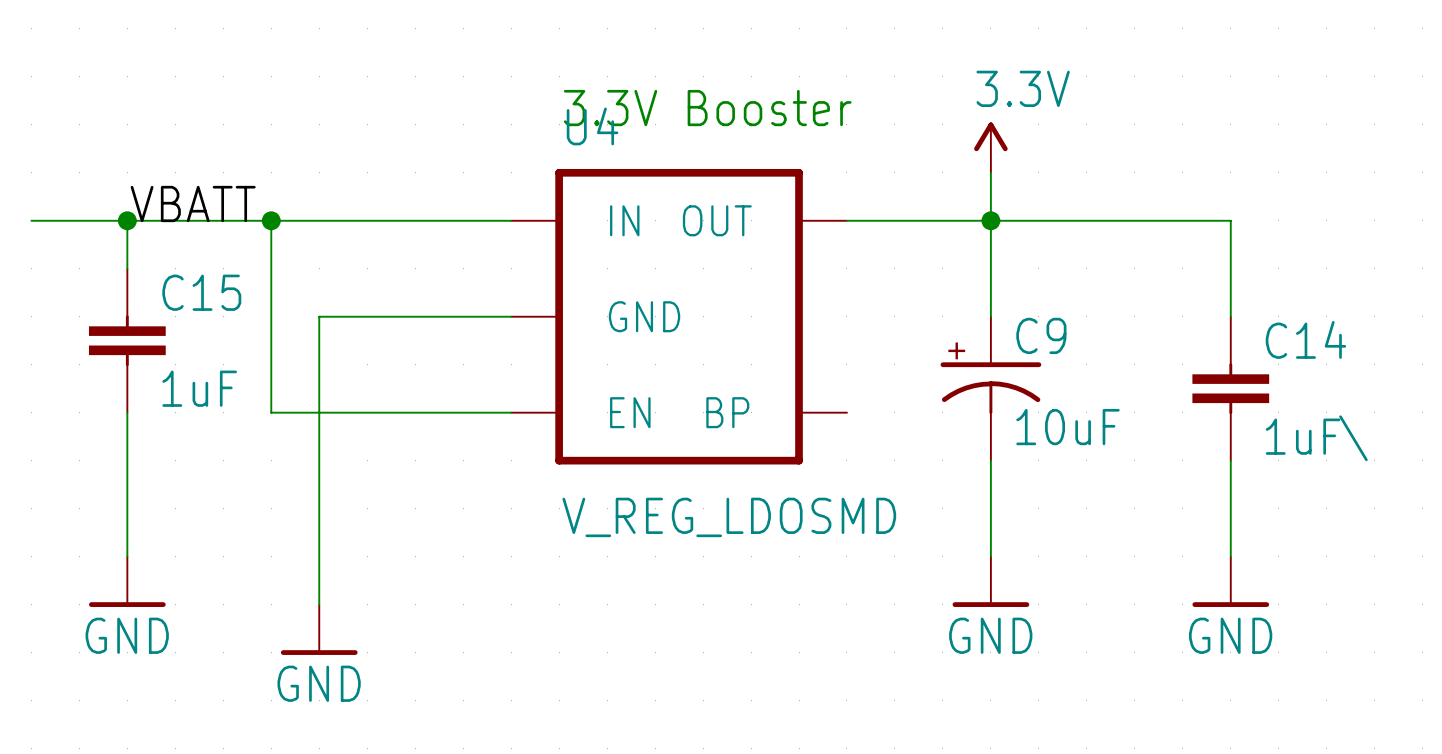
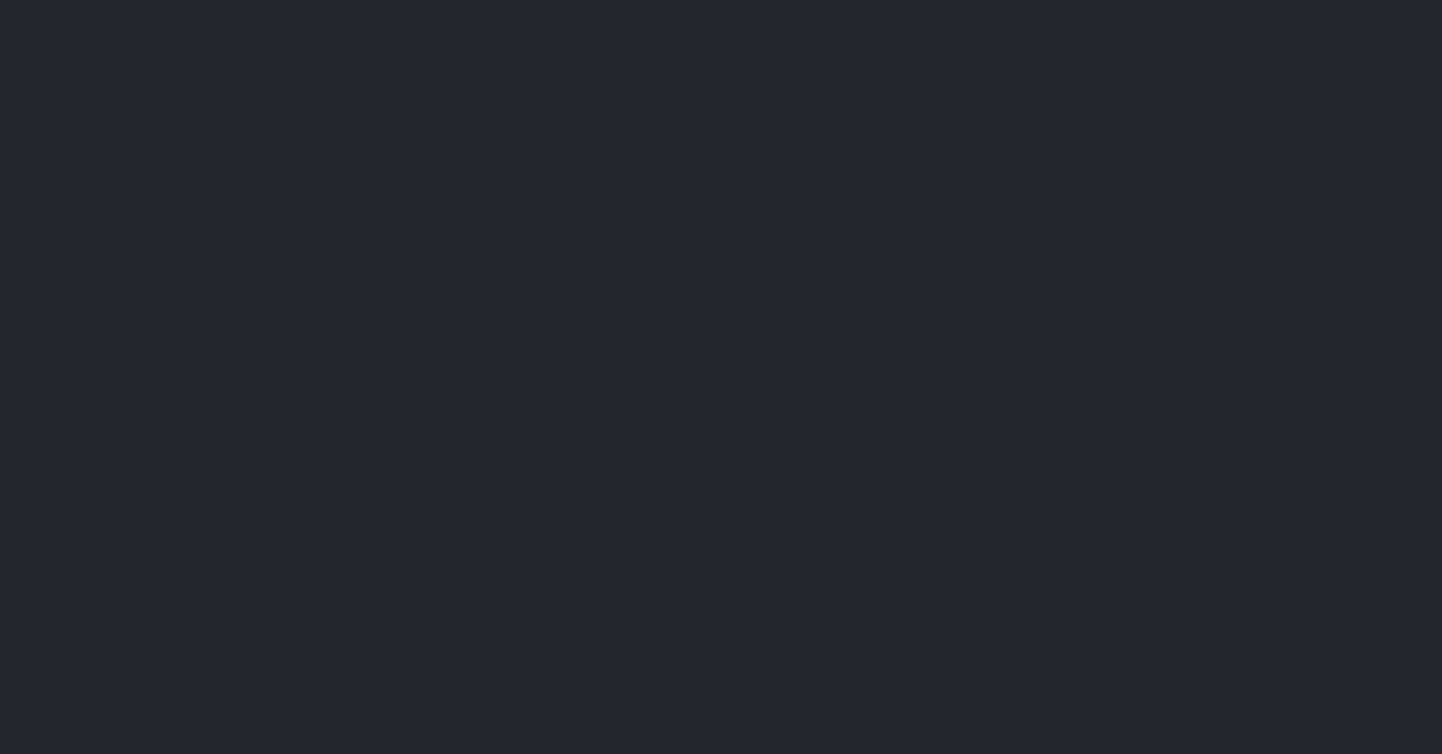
text: 3.3V Booster (707, 108) -> none
power symbol: 3.3V (990, 147) -> none
wire: (990, 172) (990, 316) -> none
label: VBATT (193, 203) -> none
wire: (31, 220) (511, 220) -> none
wire: (127, 220) (127, 268) -> none
junction: (127, 220) -> none
wire: (271, 220) (271, 412) (511, 412) -> none
junction: (271, 220) -> none
wire: (846, 220) (1230, 220) (1230, 316) -> none
junction: (990, 220) -> none
wire: (511, 316) (319, 316) (319, 604) -> none
U4: V_REG_LDOSMD (679, 316) -> none
C15: 1uF (127, 340) -> none
C9: 10uF (990, 388) -> none
C14: 1uF\ (1230, 388) -> none
wire: (127, 412) (127, 556) -> none
wire: (990, 460) (990, 556) -> none
wire: (1230, 460) (1230, 556) -> none
power symbol: GND (127, 581) -> none
power symbol: GND (990, 581) -> none
power symbol: GND (1230, 581) -> none
power symbol: GND (319, 629) -> none

